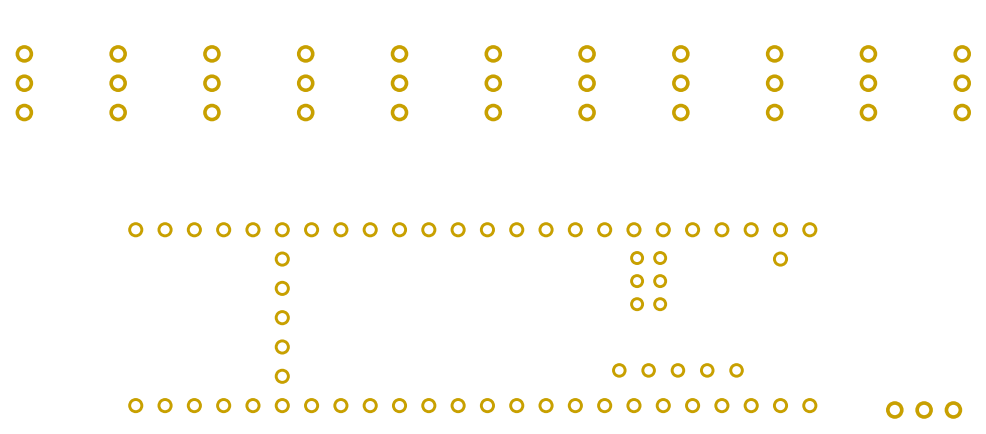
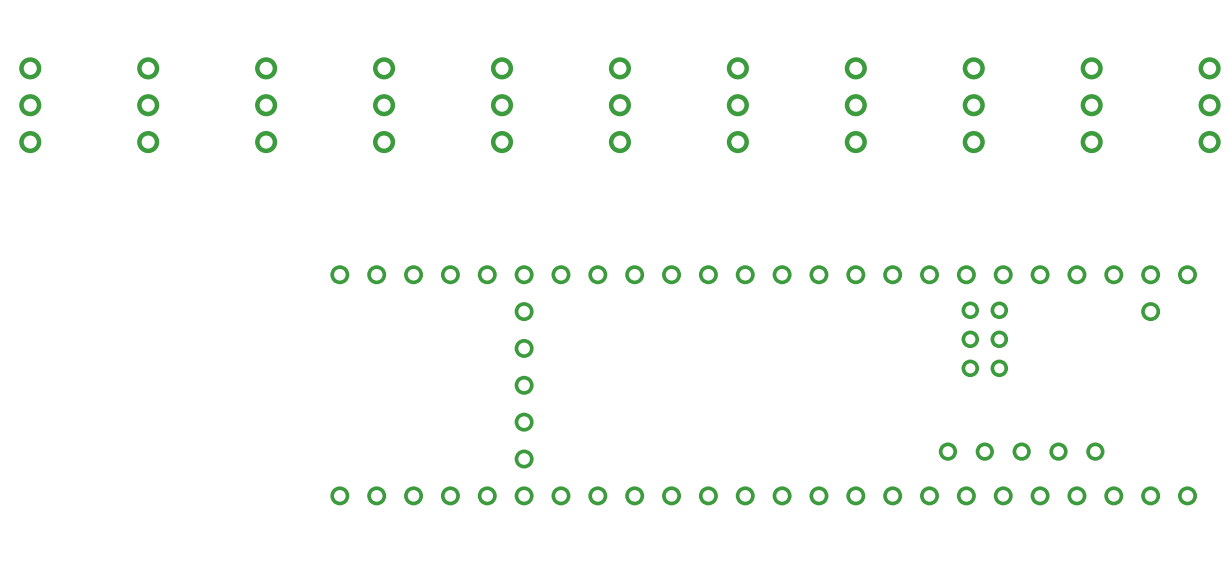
part position: (472, 317) -> (763, 385)
part: (924, 409) -> none

